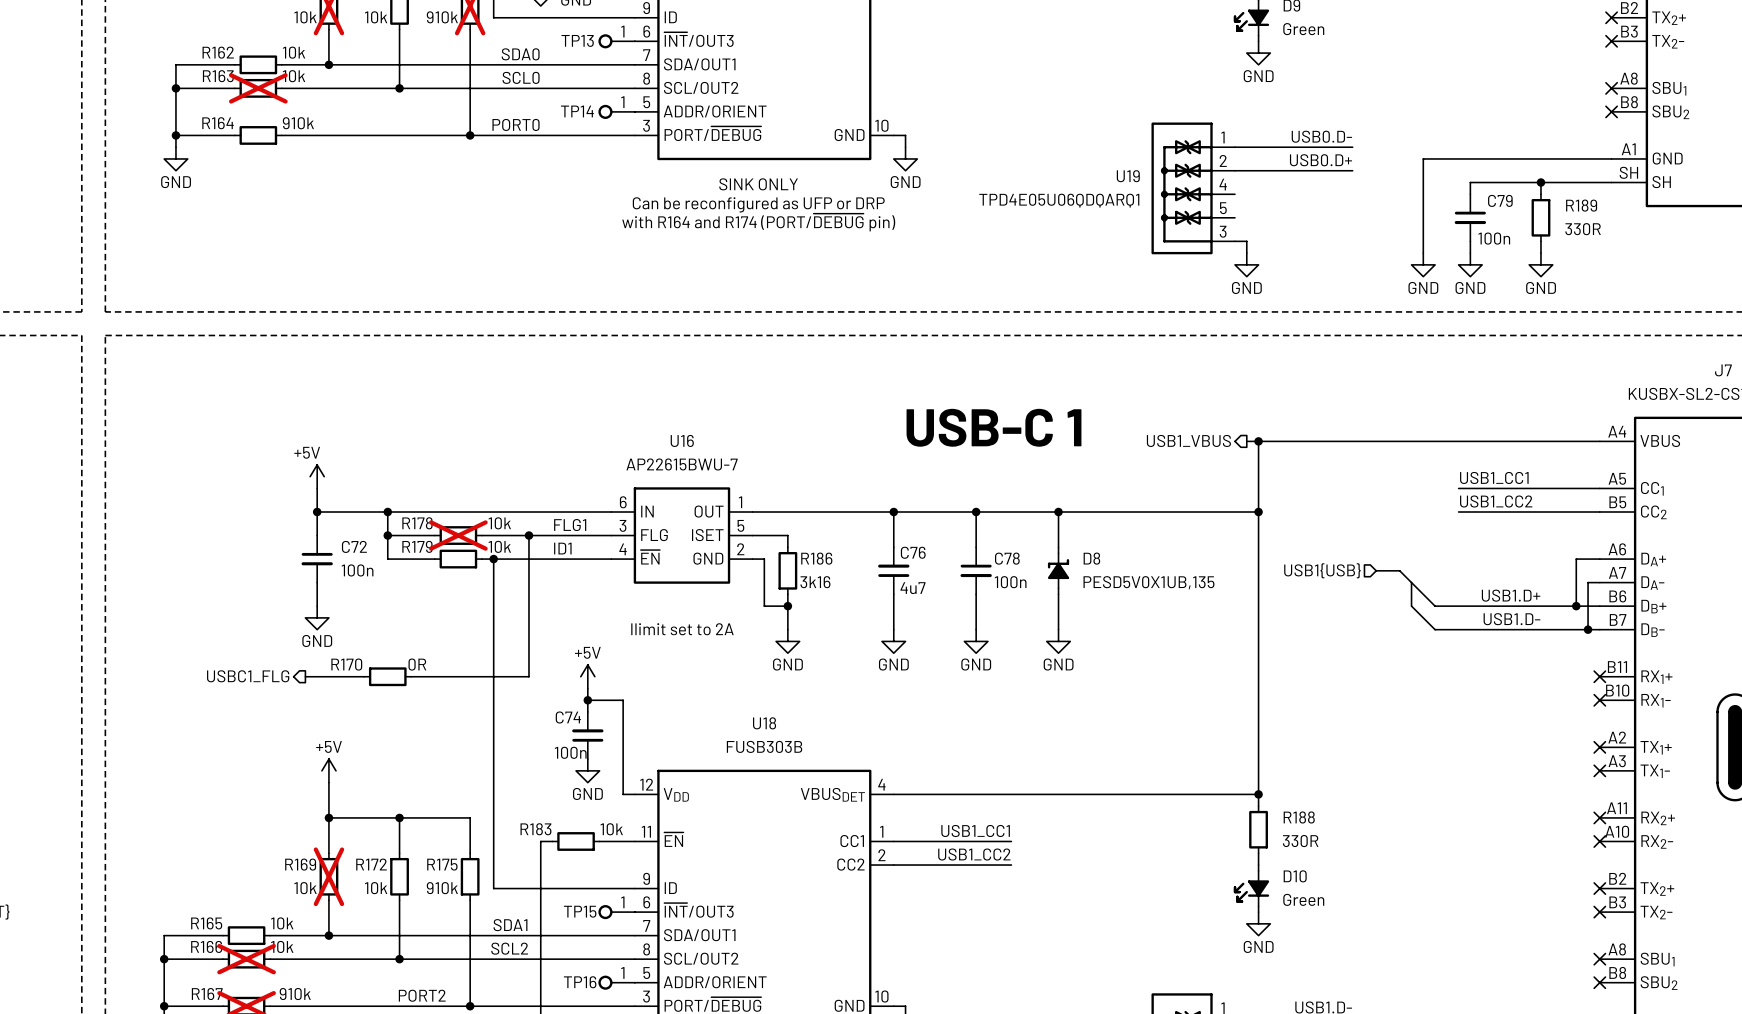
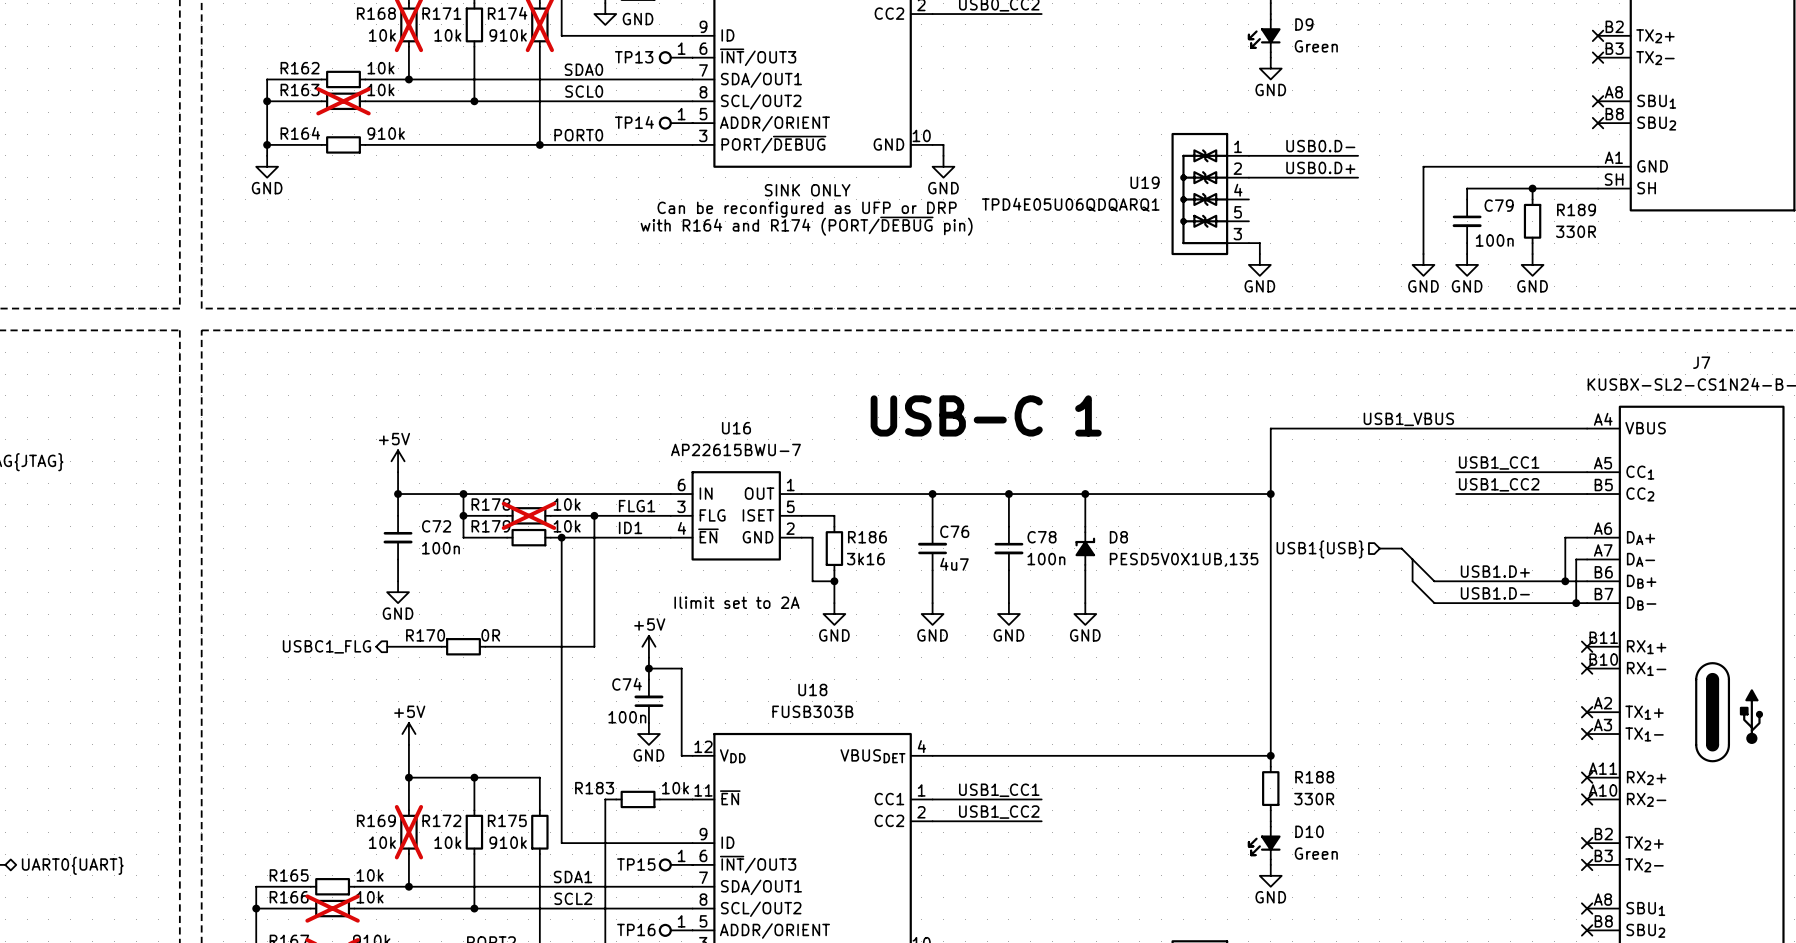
label: none -> USB1_VBUS (1408, 419)
hierarchical label: USB1_VBUS (1188, 440) -> none
wire: (1246, 441) (1258, 441) -> none
junction: (1258, 441) -> none

